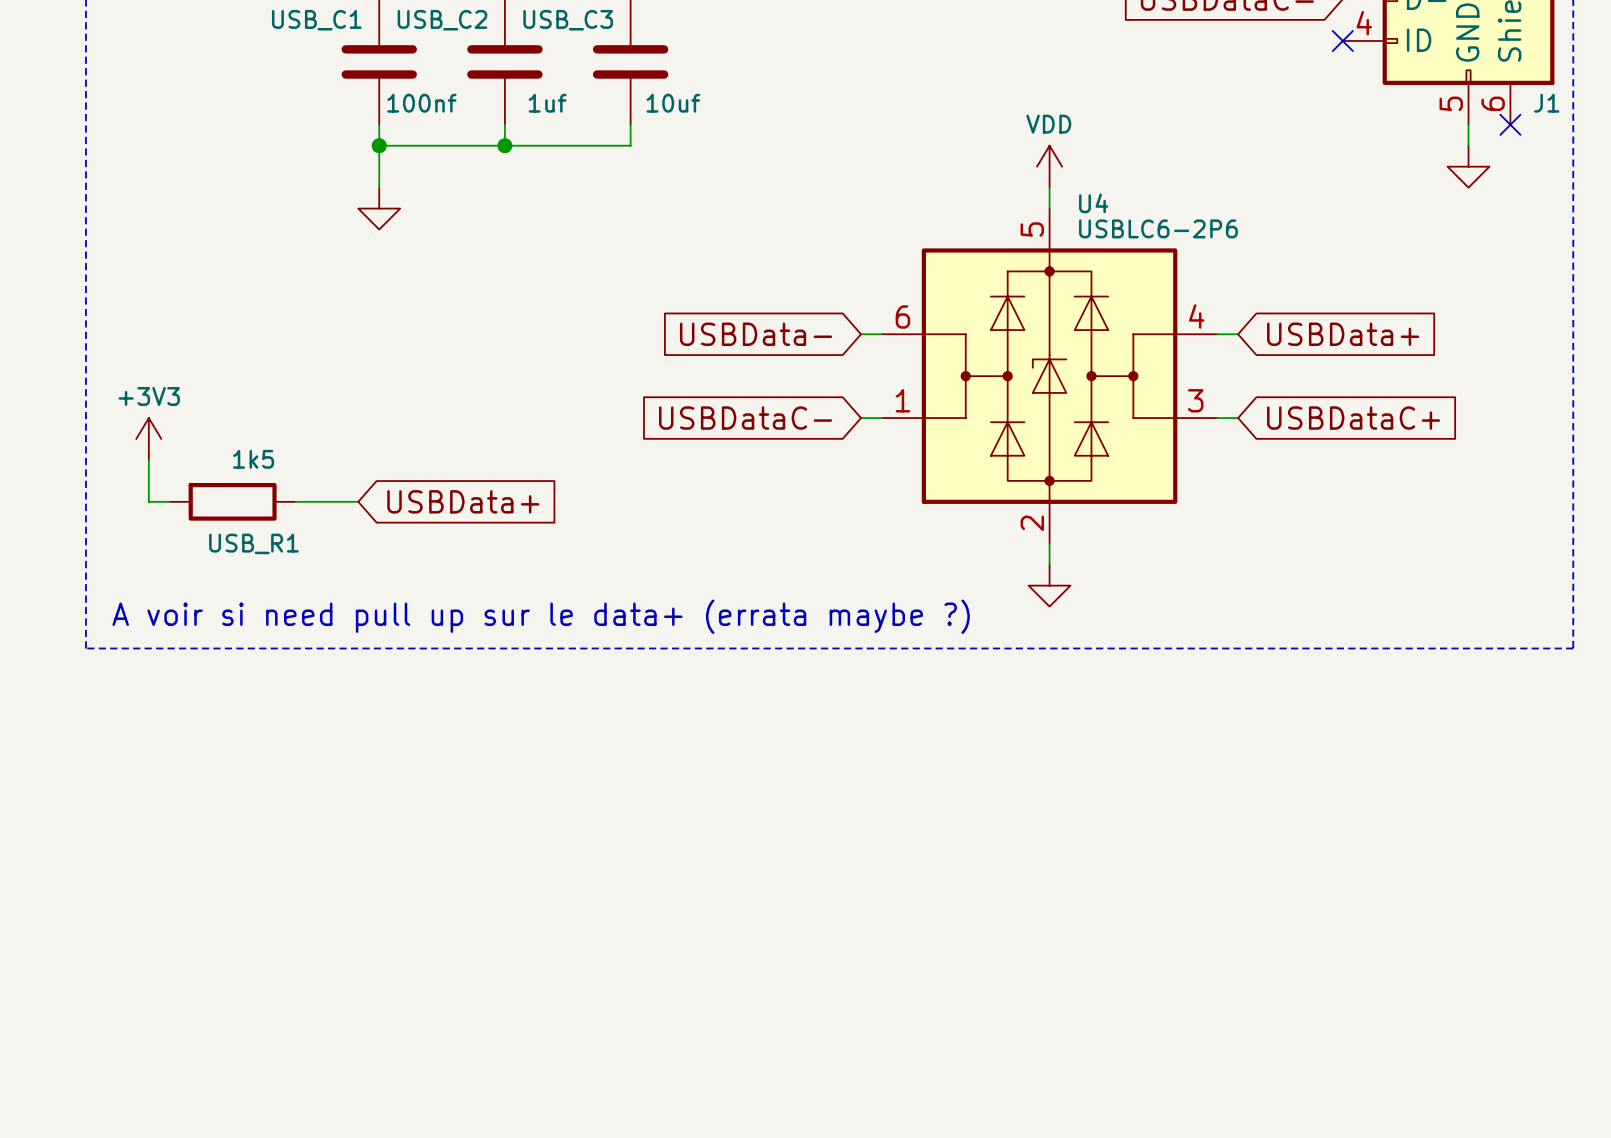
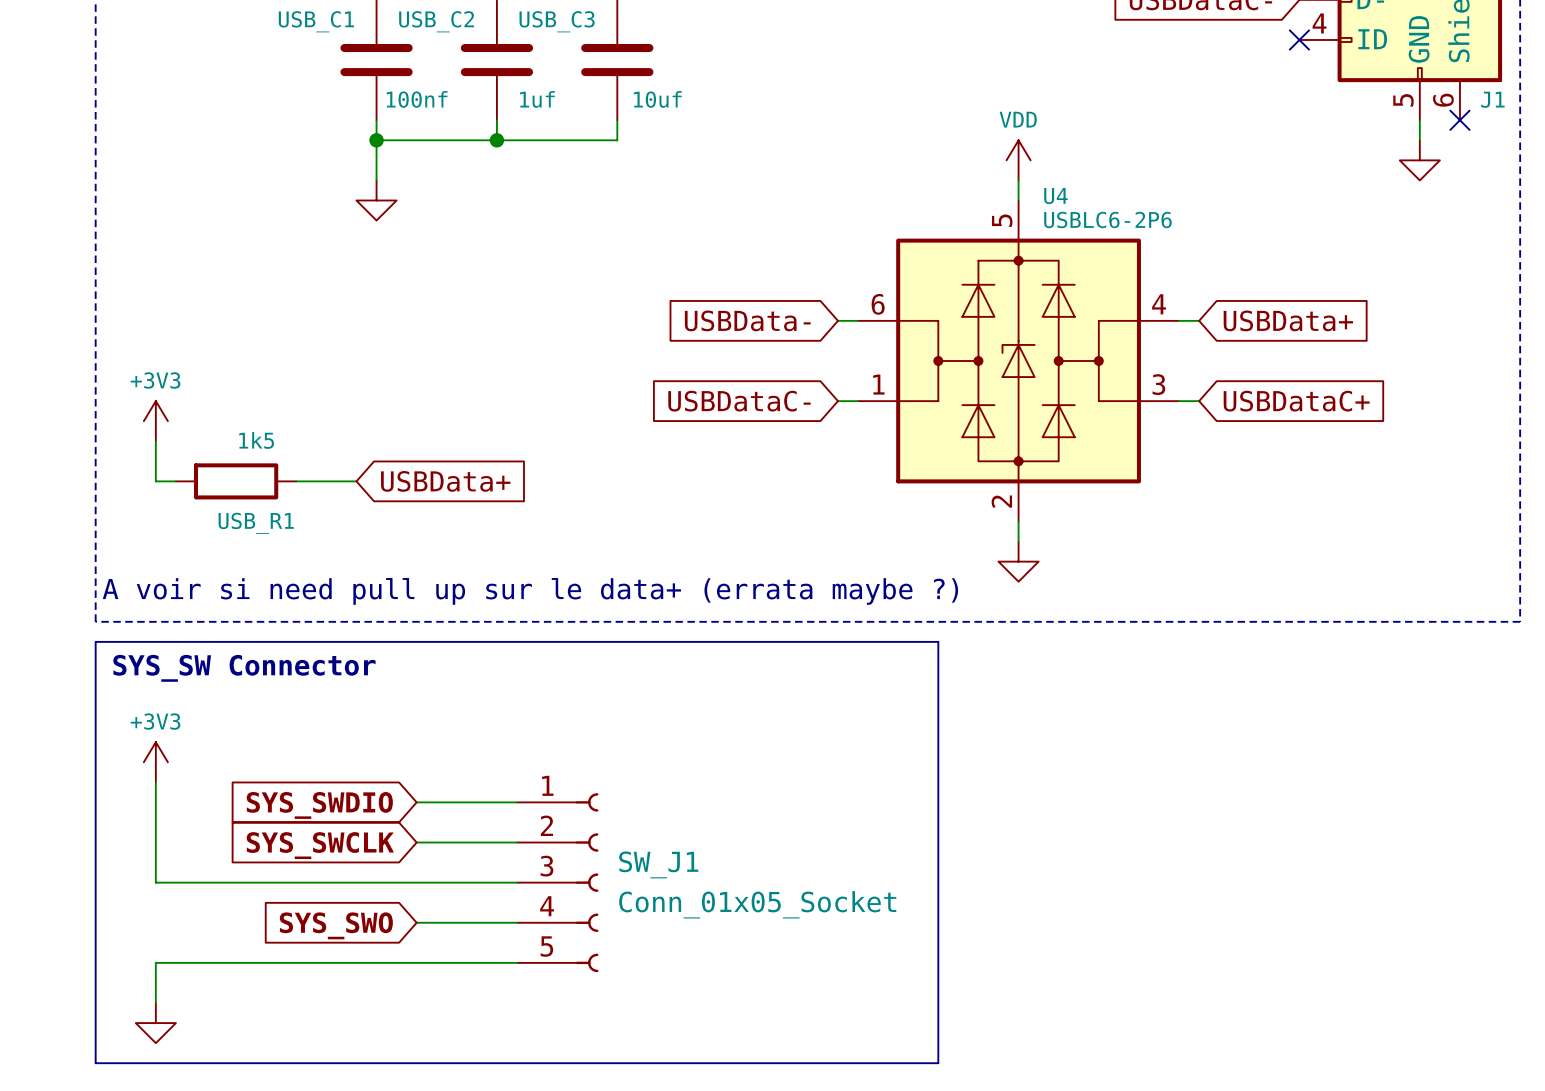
line: none -> (95, 641) (938, 641) (938, 1063) (95, 1063) (95, 641)
text: none -> SYS_SW Connector (244, 668)
power symbol: none -> +3V3 (155, 762)
wire: none -> (155, 782) (155, 882) (516, 882)
wire: none -> (416, 802) (516, 802)
global label: none -> SYS_SWDIO (319, 805)
wire: none -> (416, 842) (516, 842)
global label: none -> SYS_SWCLK (320, 845)
SW_J1: none -> Conn_01x05_Socket (557, 882)
wire: none -> (416, 922) (516, 922)
global label: none -> SYS_SWO (336, 925)
wire: none -> (516, 962) (155, 962) (155, 1003)
power symbol: none -> (155, 1023)

